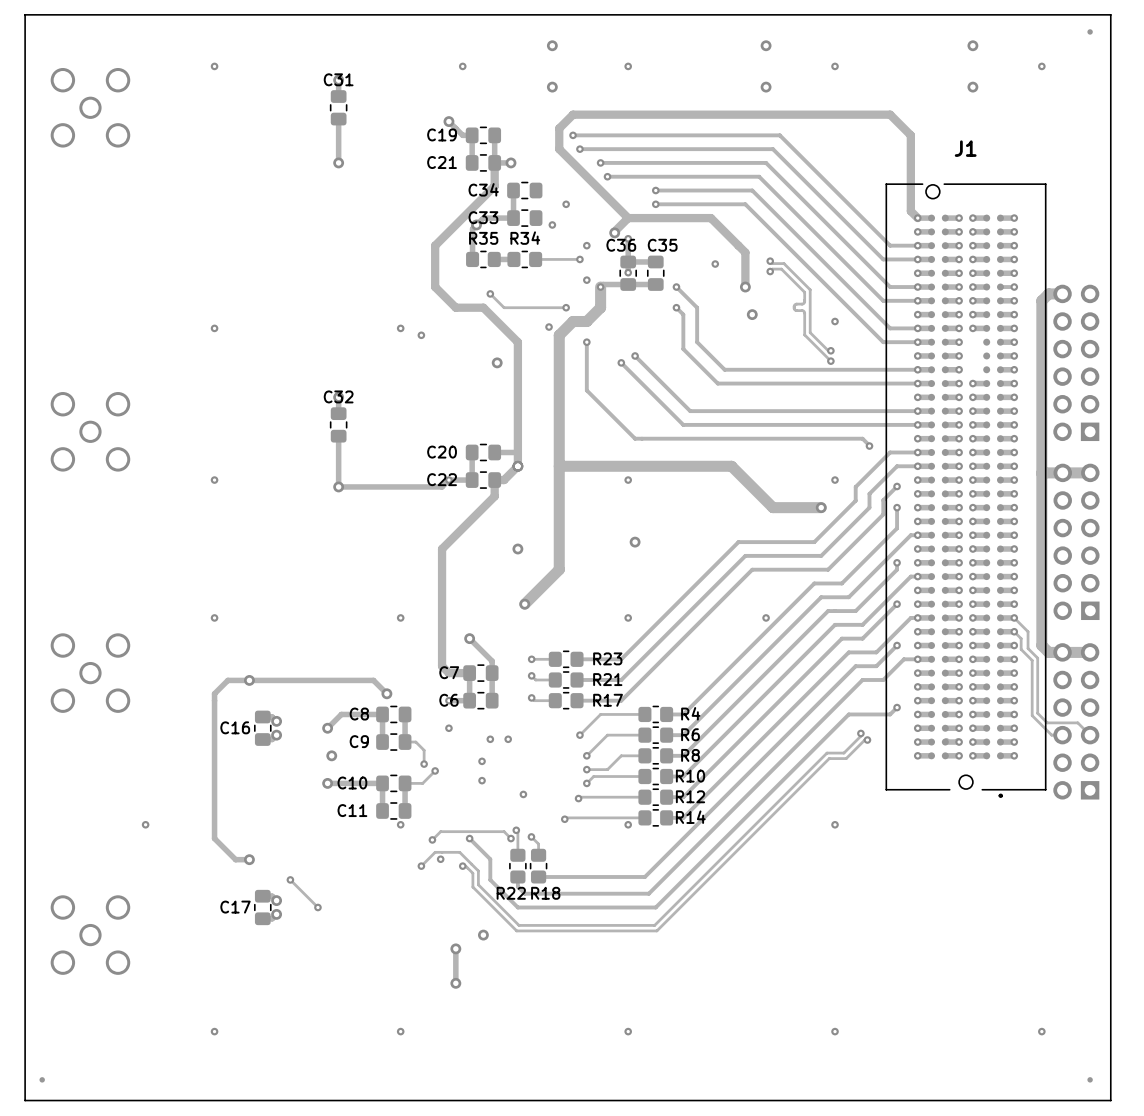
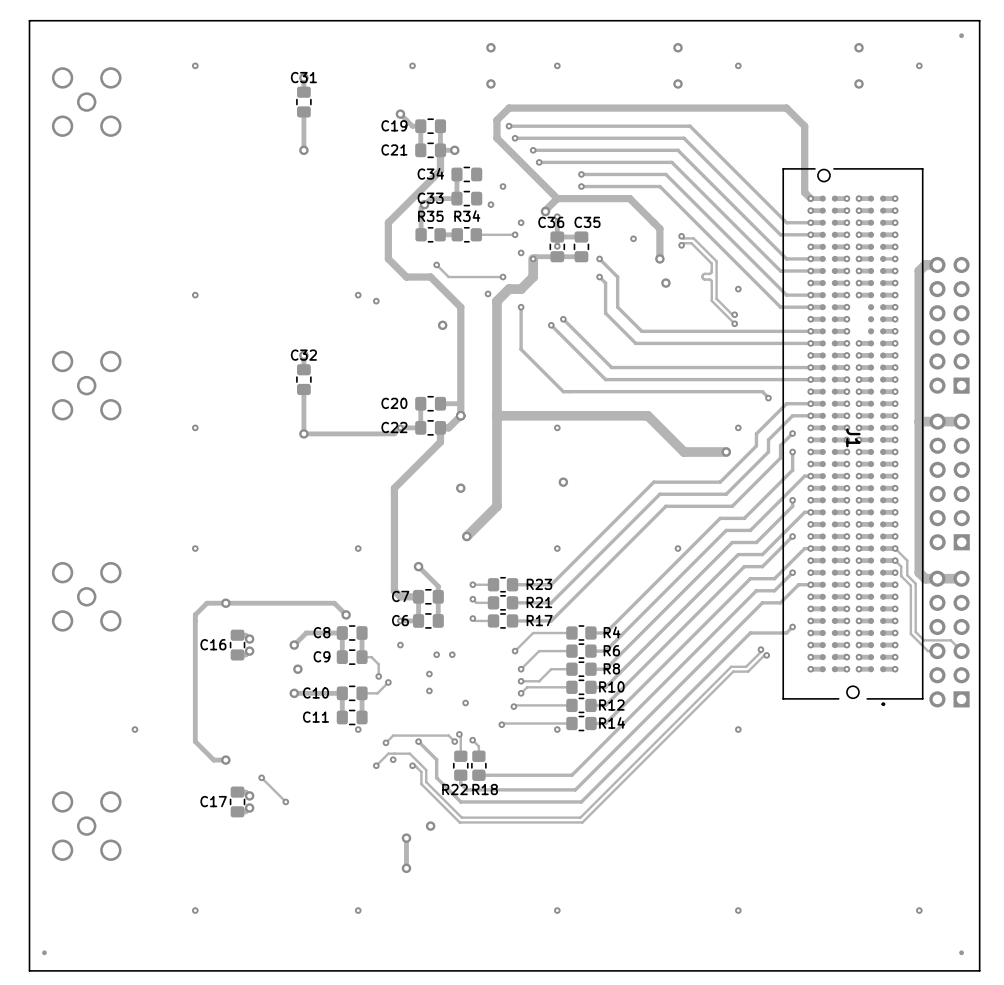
J1 name rotation: 0° (965, 148) -> 90° clockwise (853, 437)
J1 name position: J1 (965, 148) -> J1 (853, 437)

